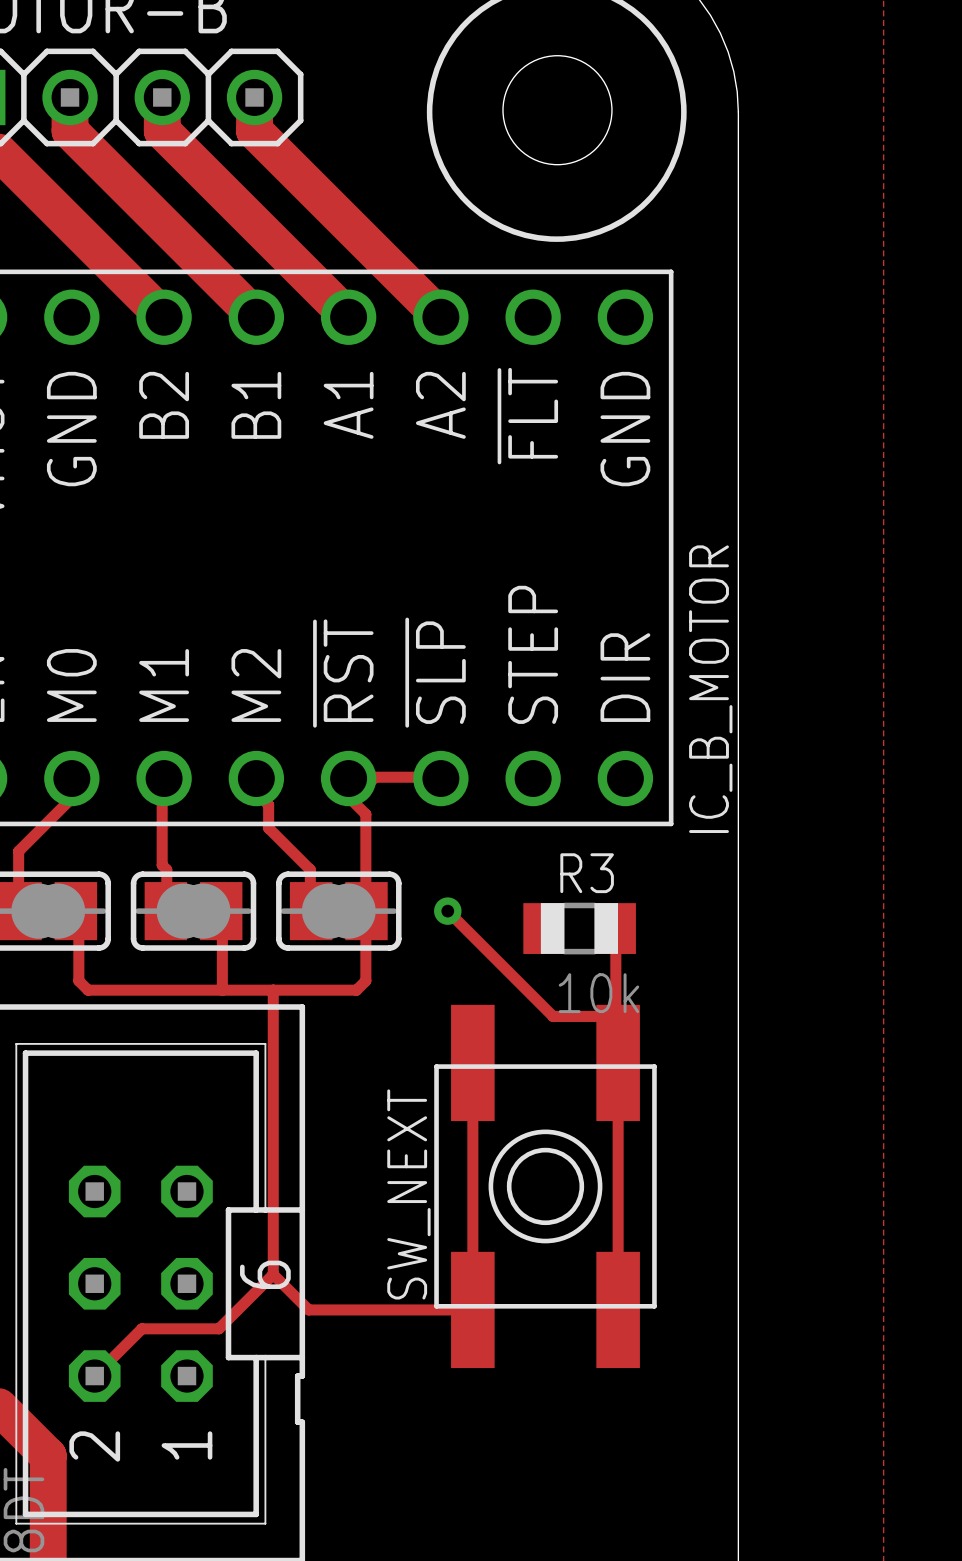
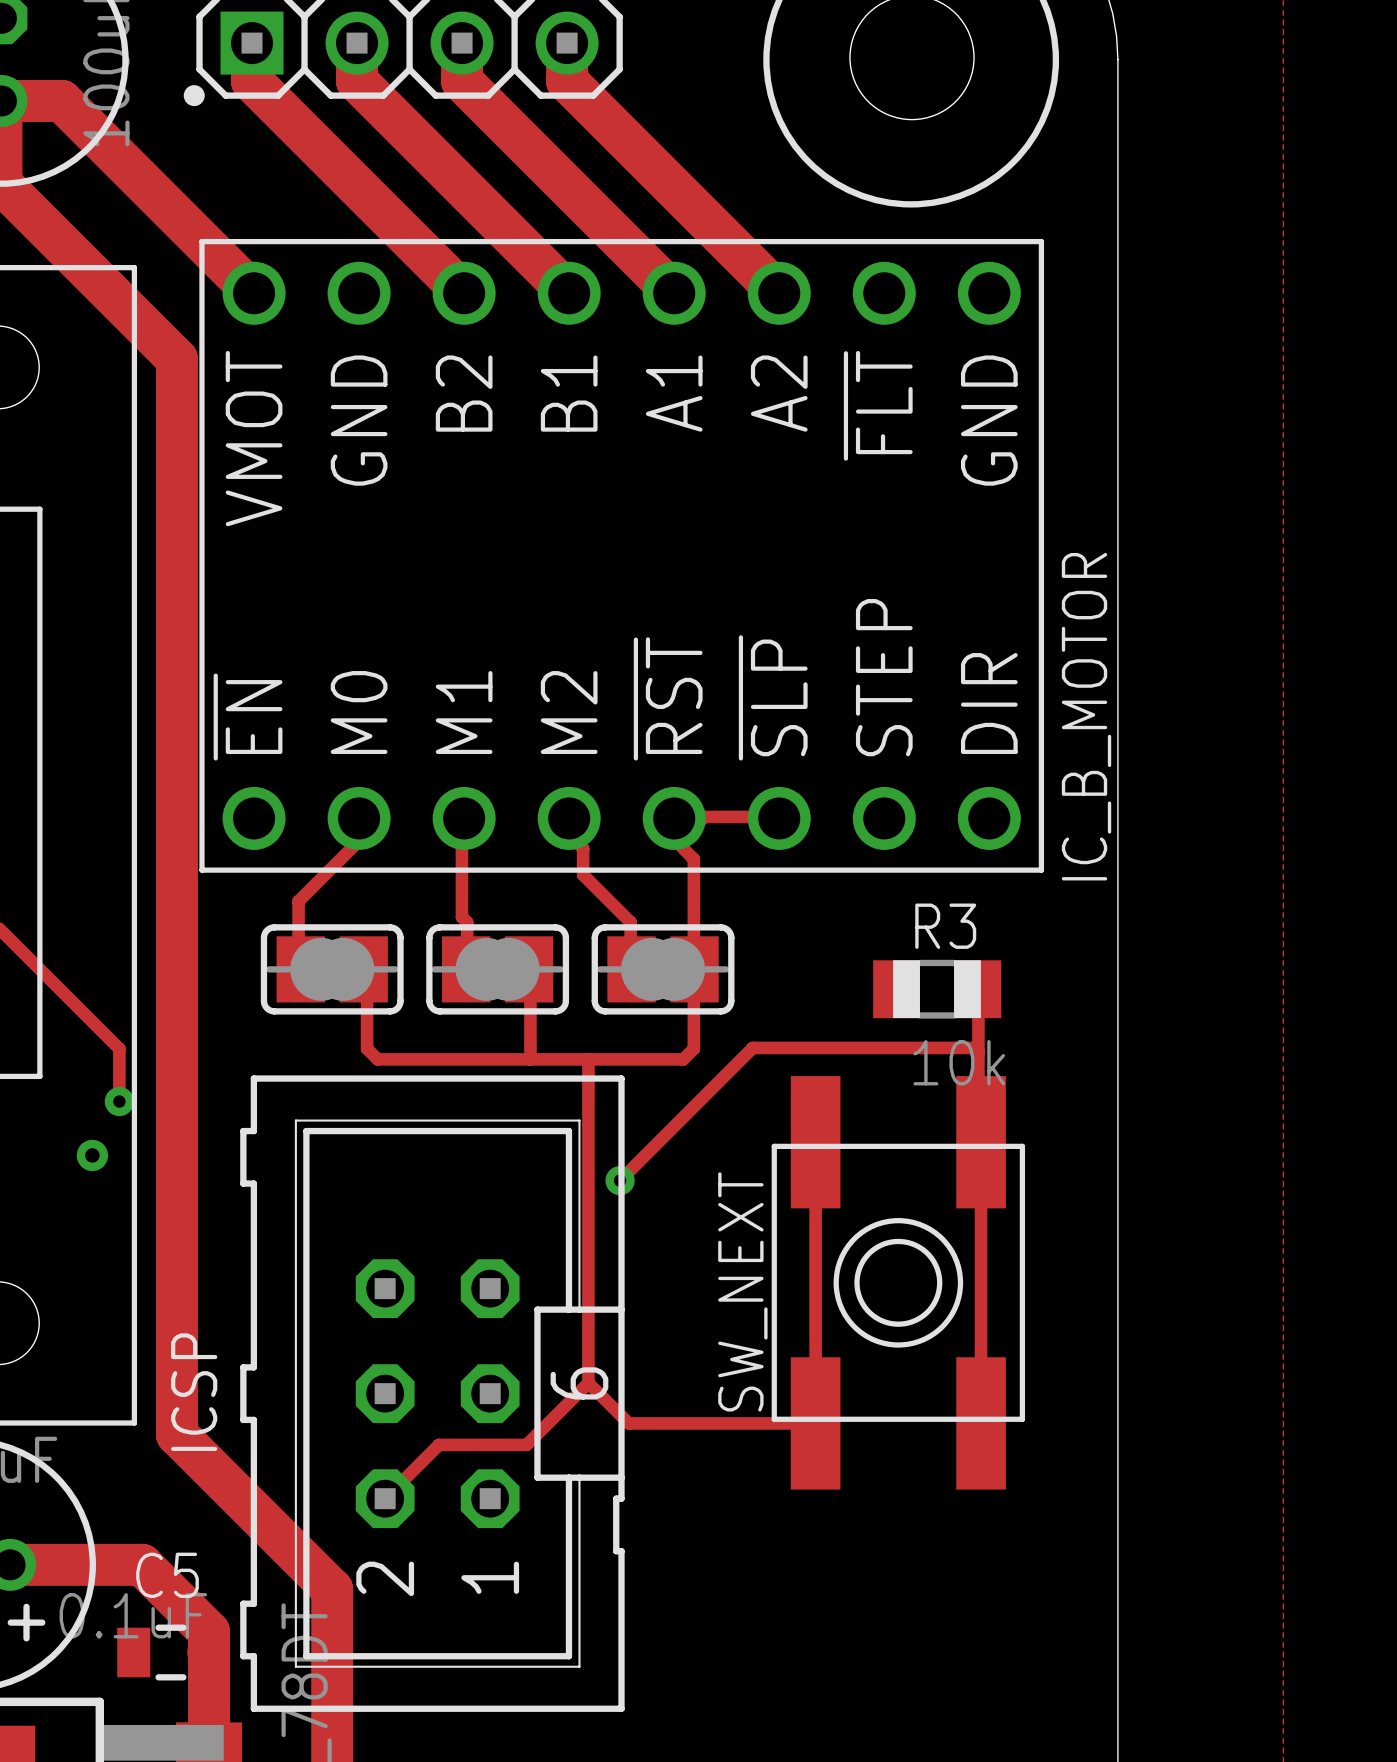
track: (447, 911) (553, 1016) (615, 1016) -> none
via: (447, 911) -> none
track: none -> (978, 1052) (974, 1047) (752, 1047) (620, 1180) (625, 1185)
via: none -> (620, 1180)

